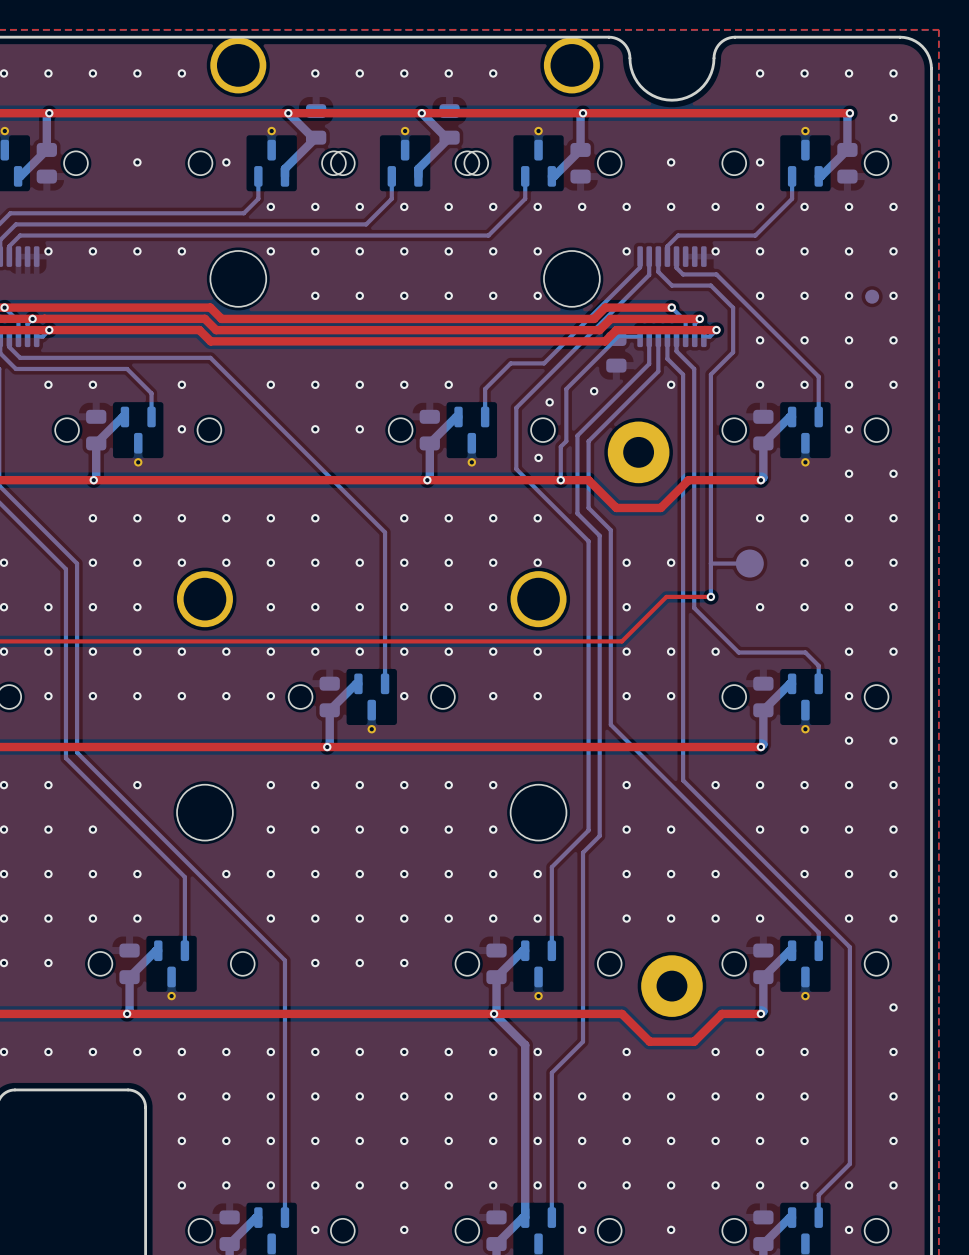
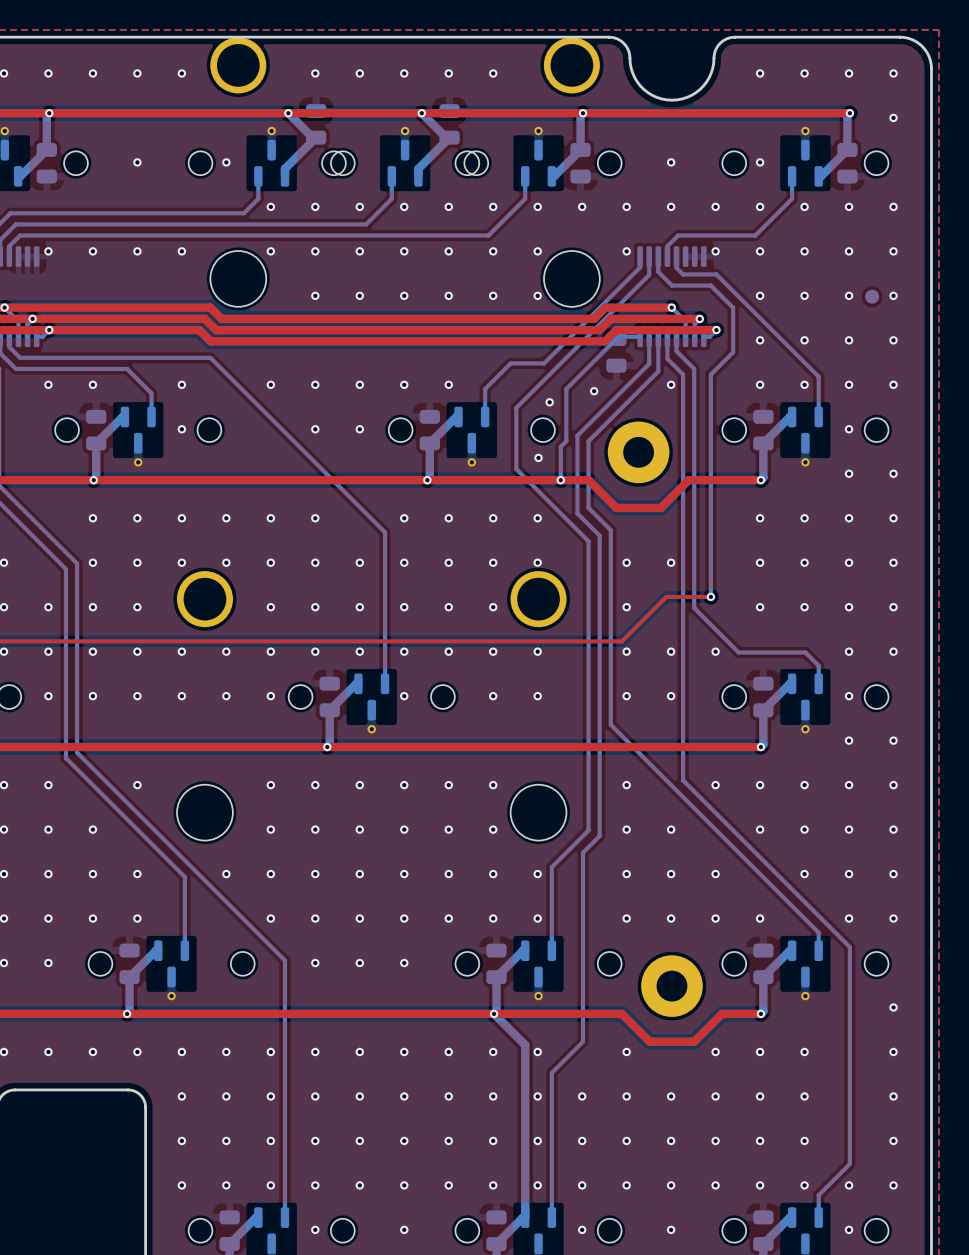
via: none -> (760, 562)
bottom track: (710, 563) (749, 563) -> none
part: (749, 563) -> none

